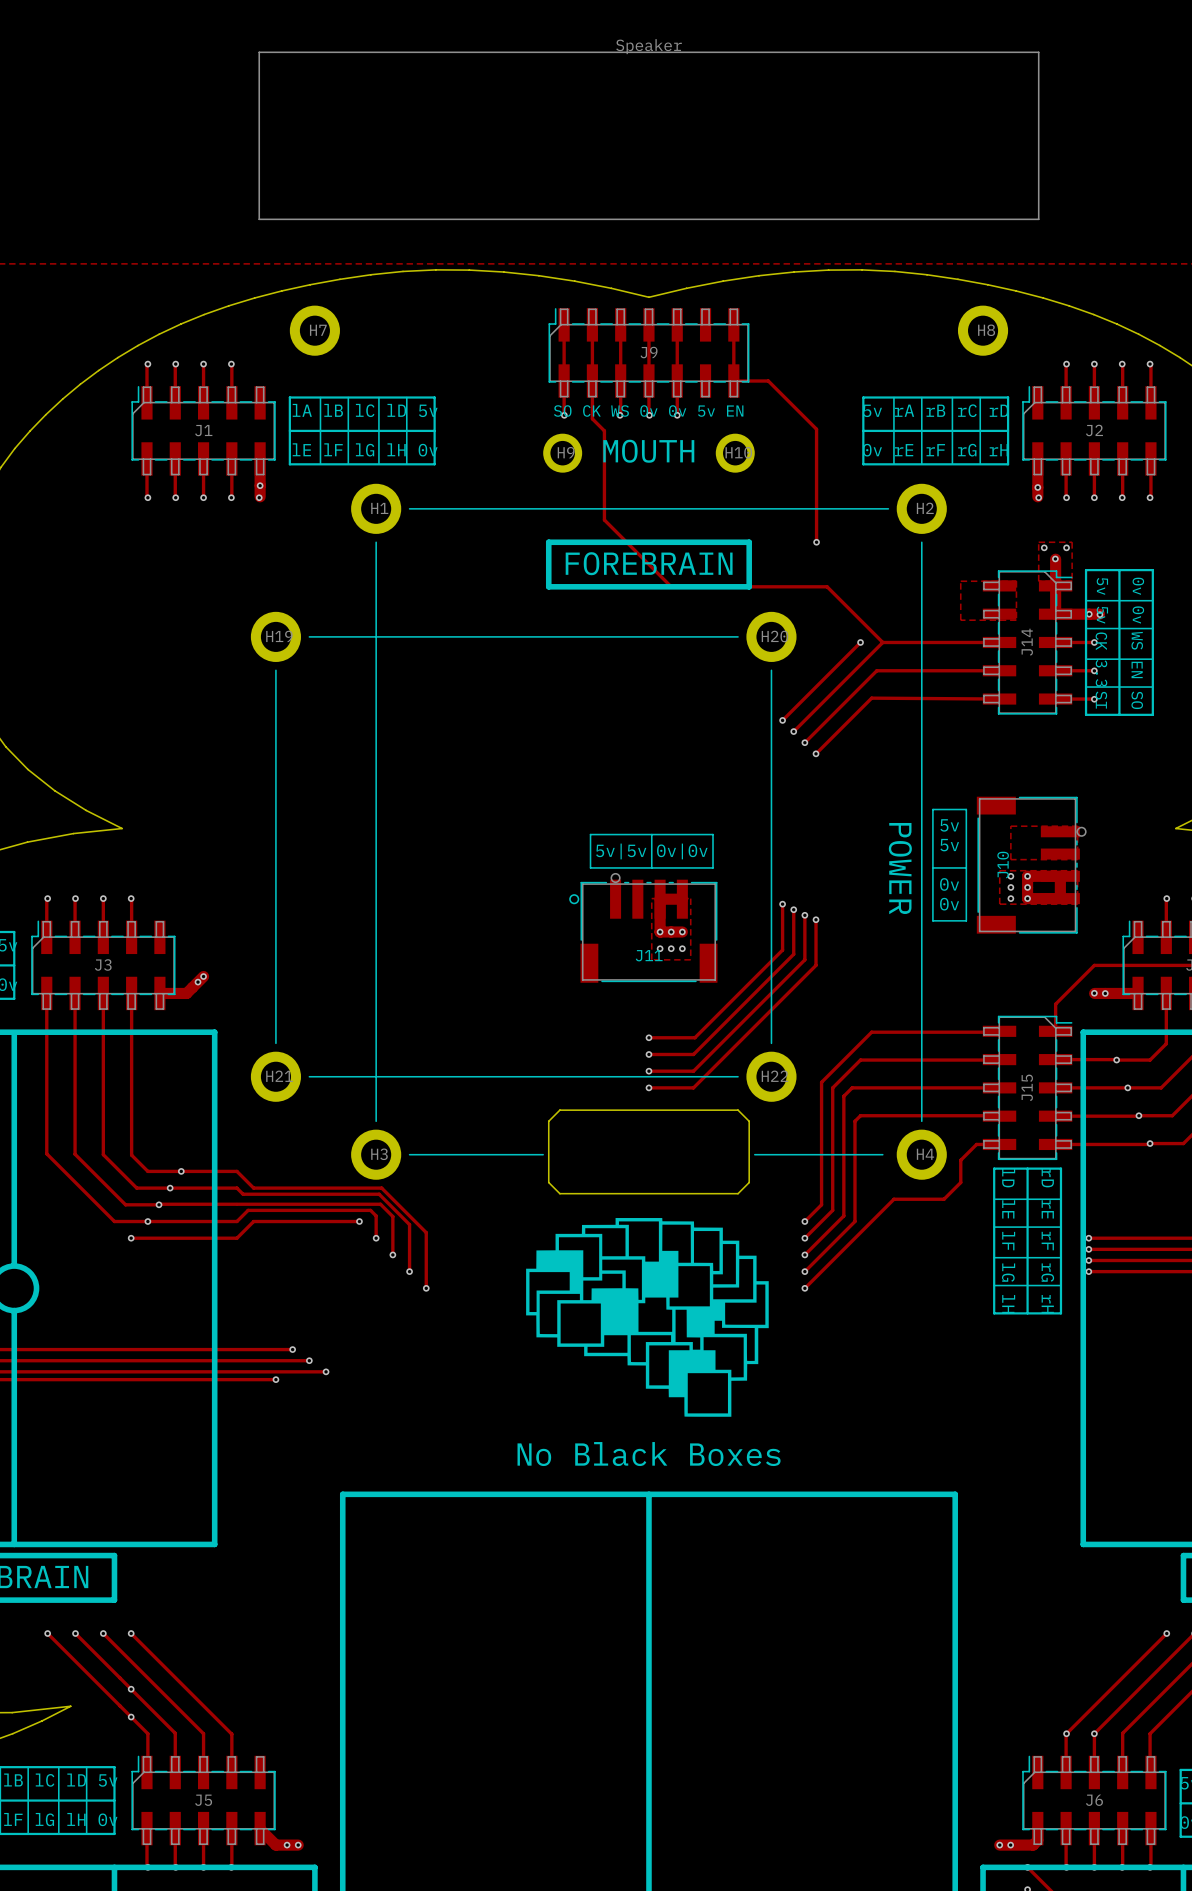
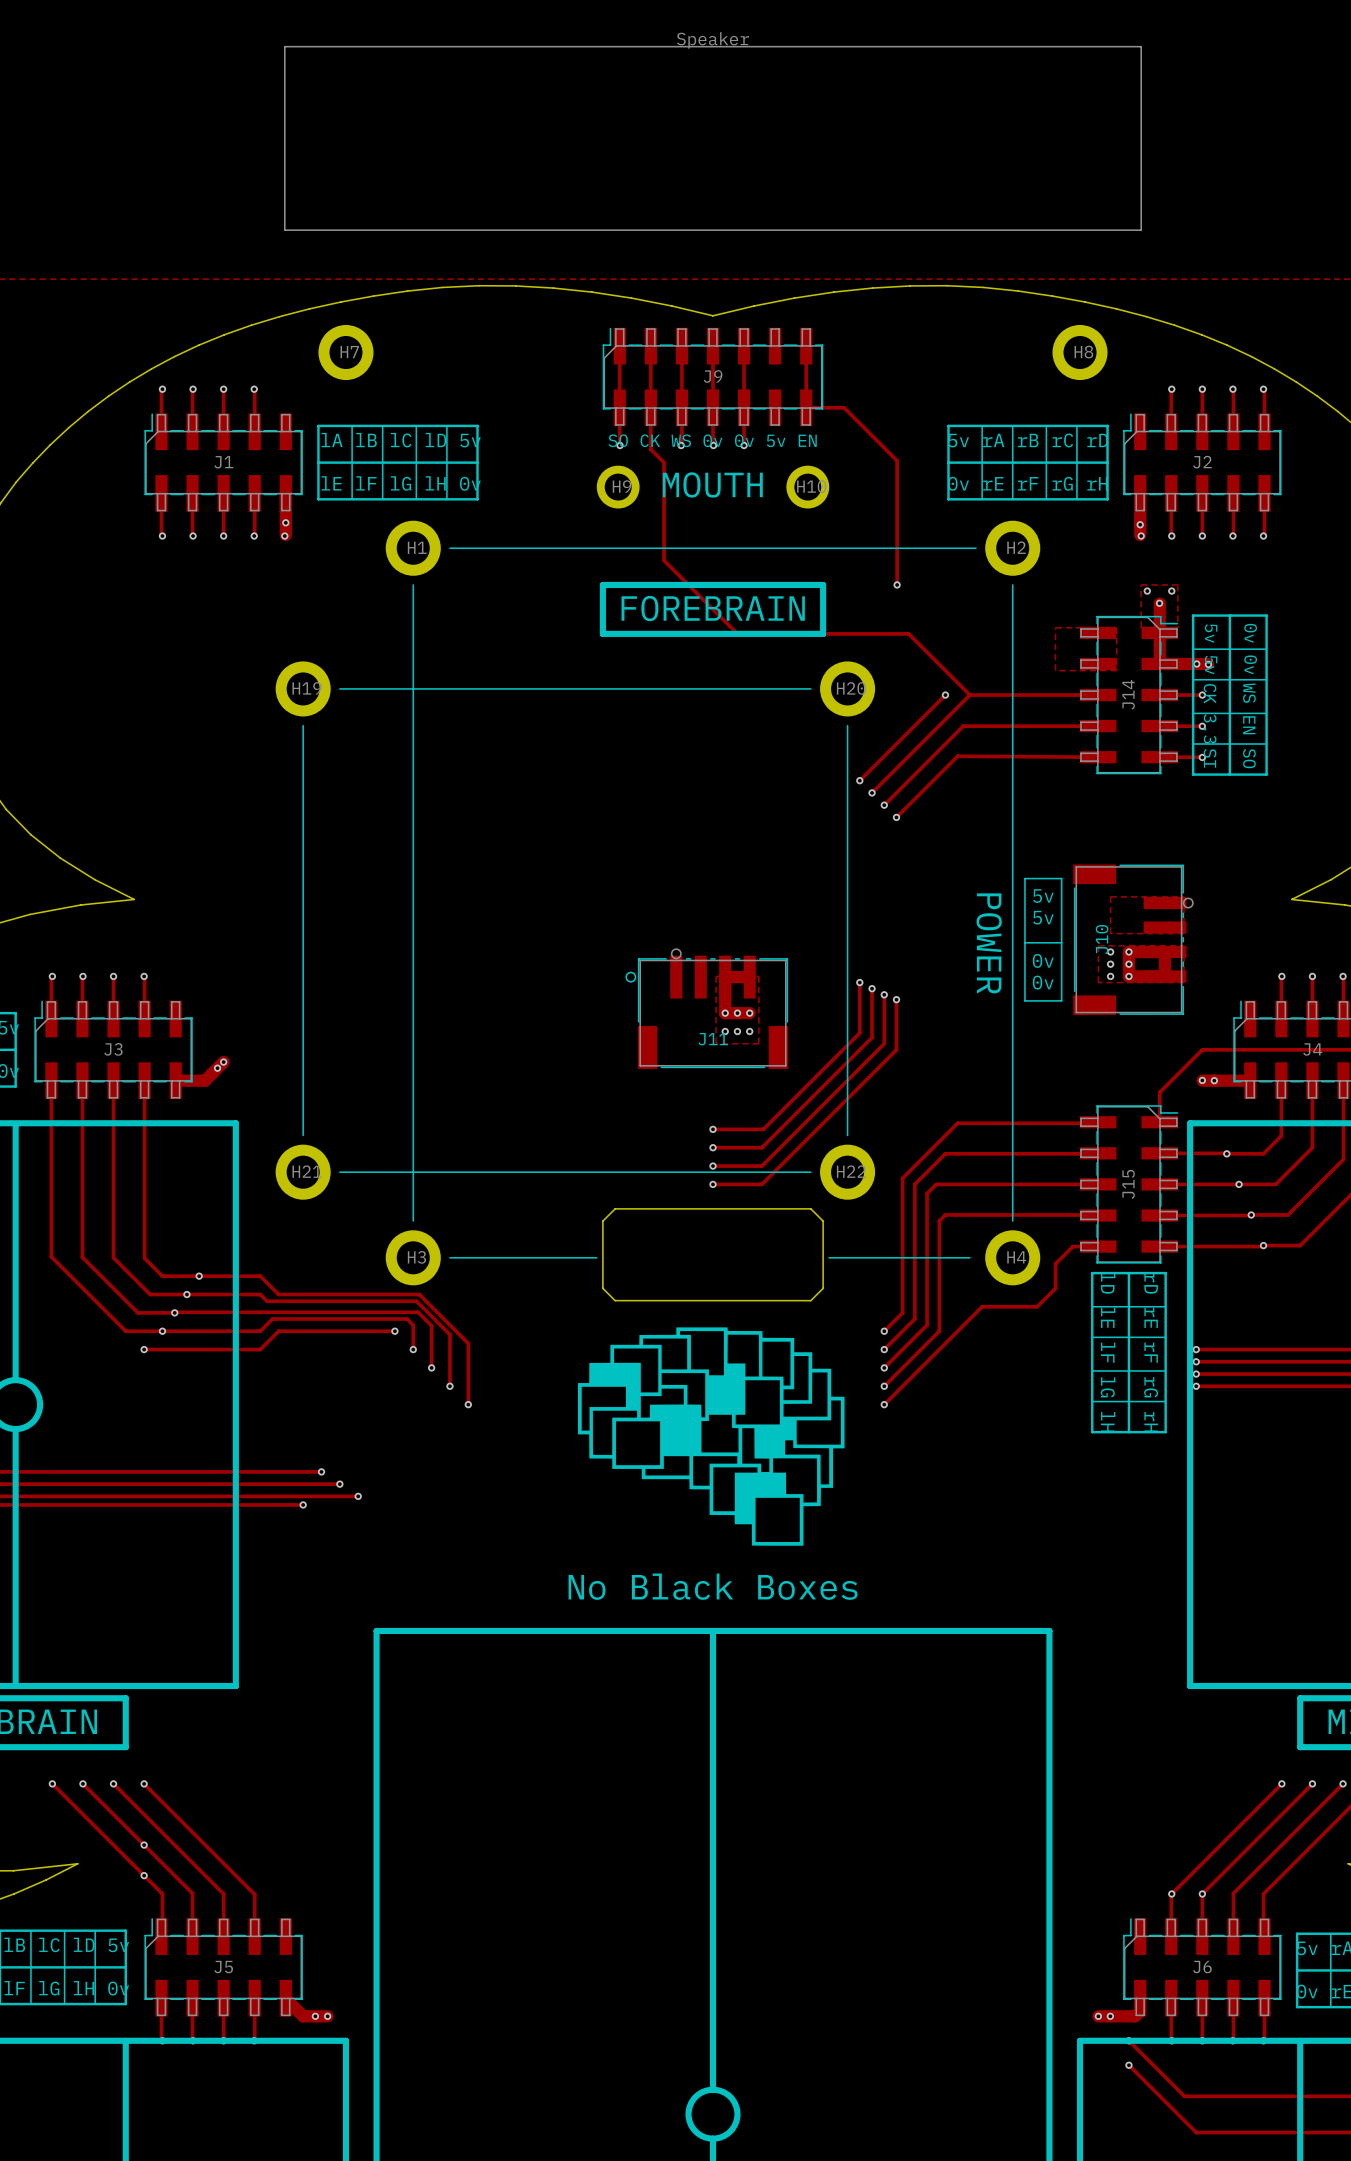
line: (590, 834) (713, 834) (713, 867) (590, 867) (590, 834) -> none
line: (651, 834) (651, 867) -> none
text: 5v|5v (621, 851) -> none
text: 0v|0v (682, 851) -> none

